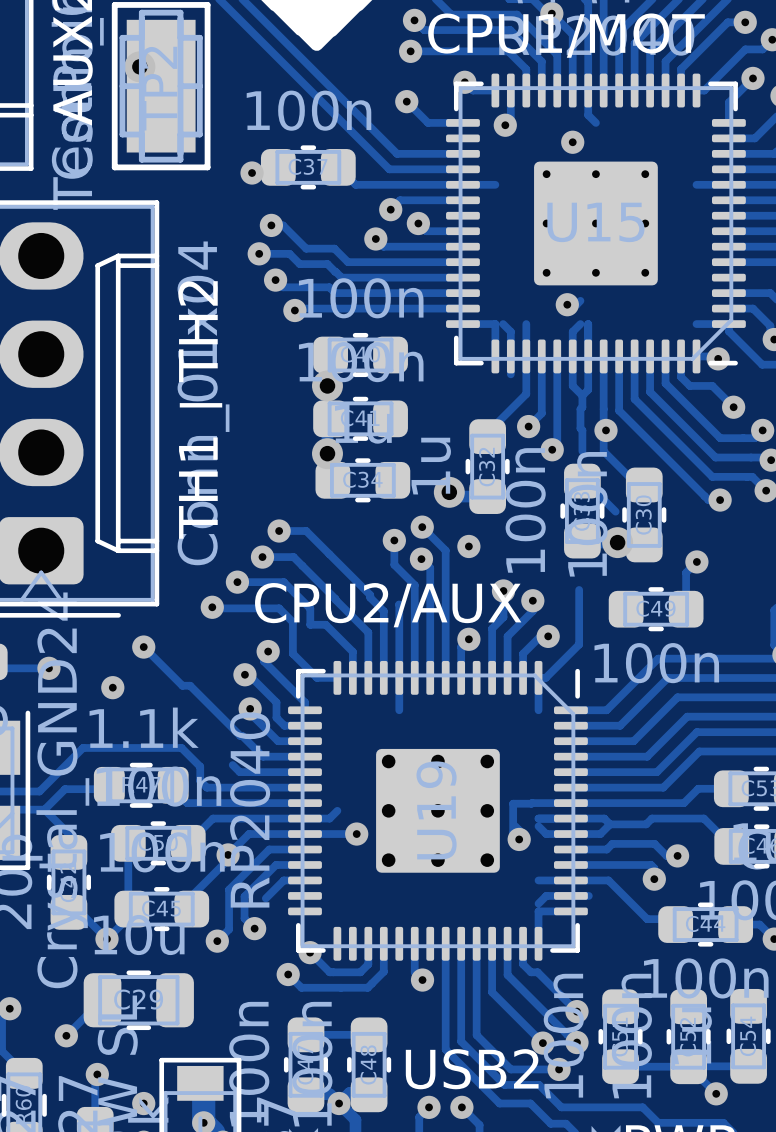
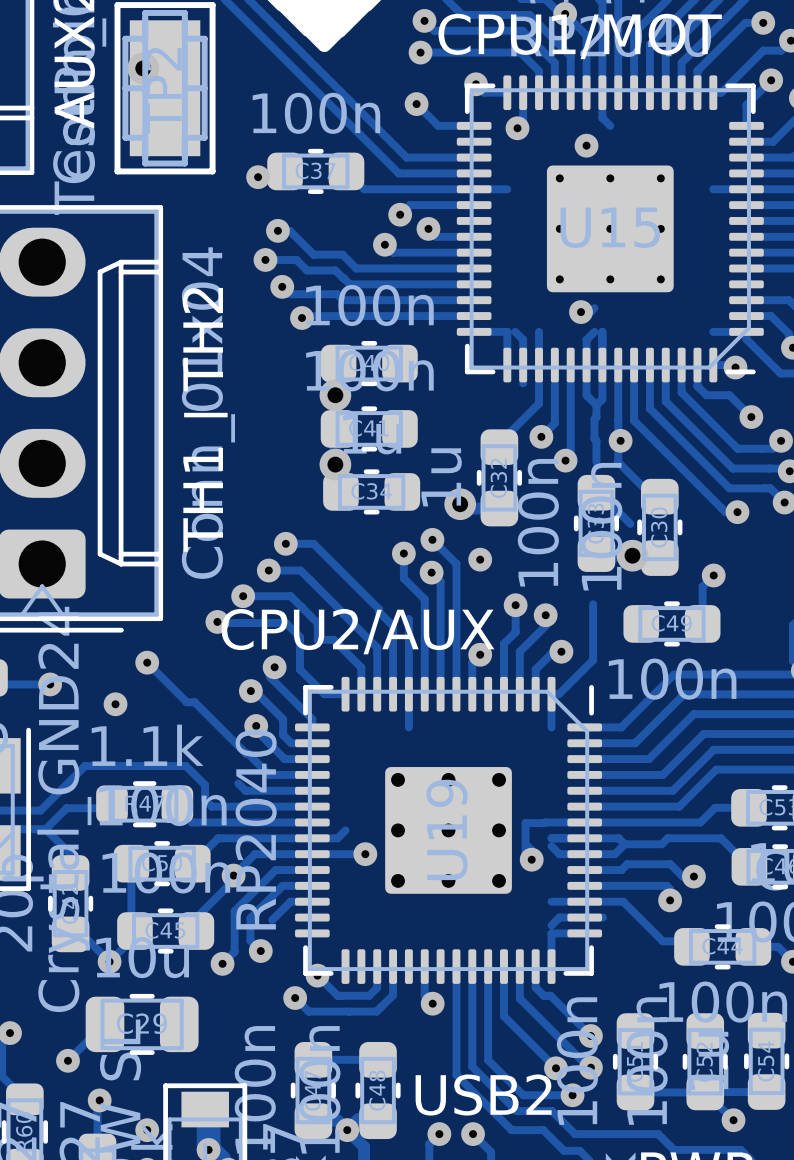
text position: CPU2/AUX (388, 605) -> CPU2/AUX (357, 631)

